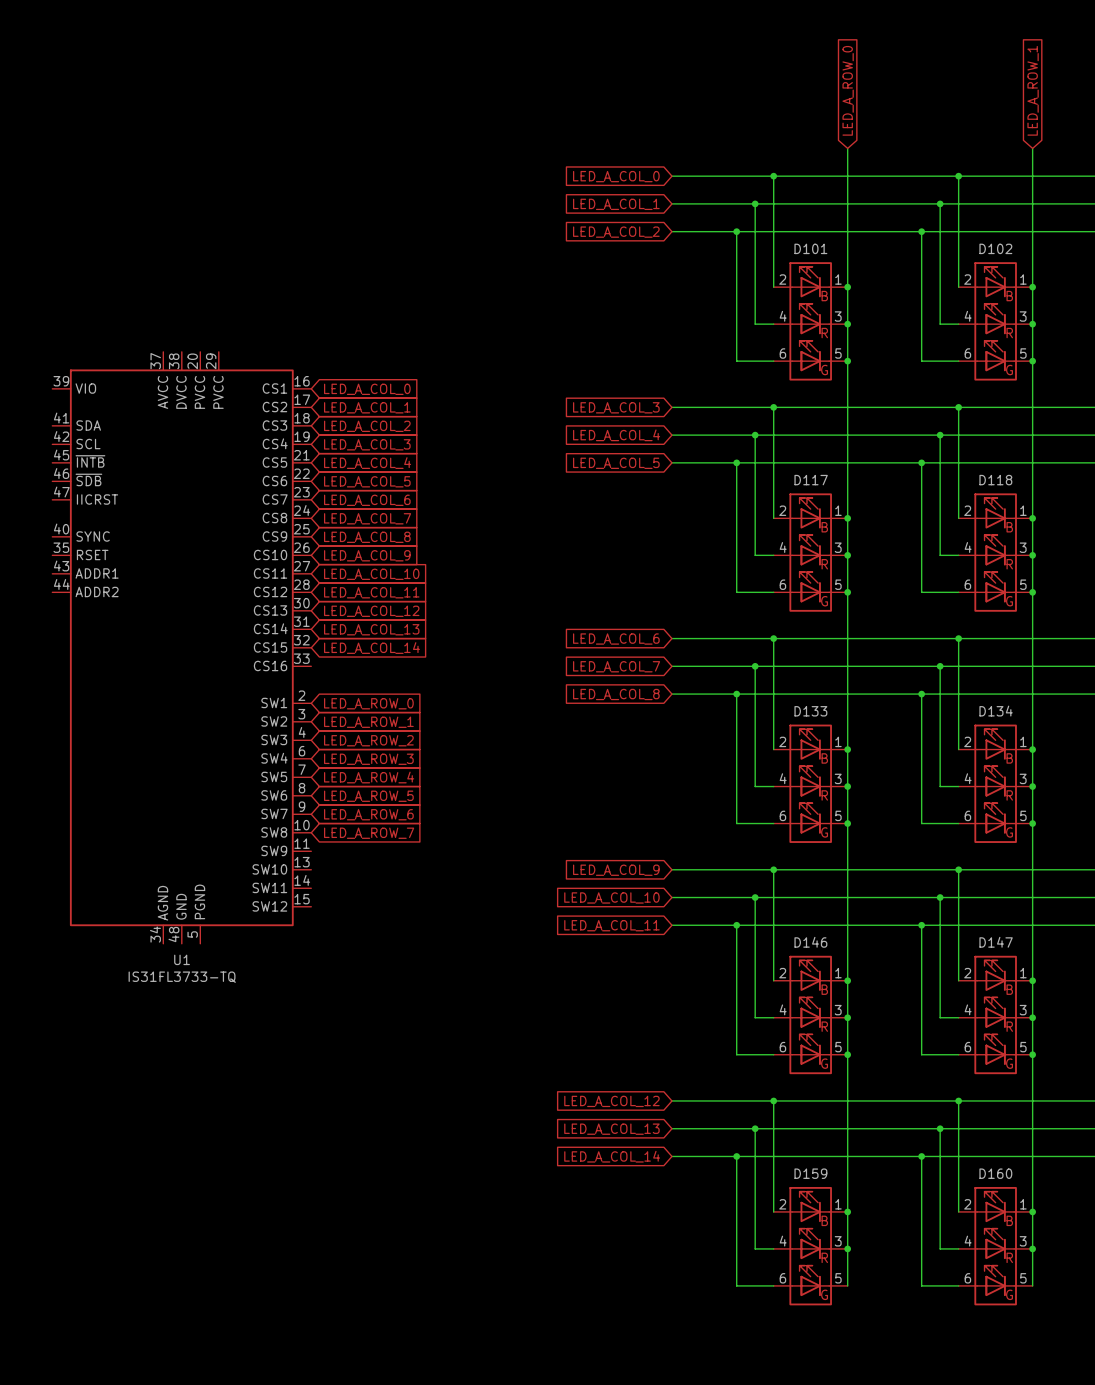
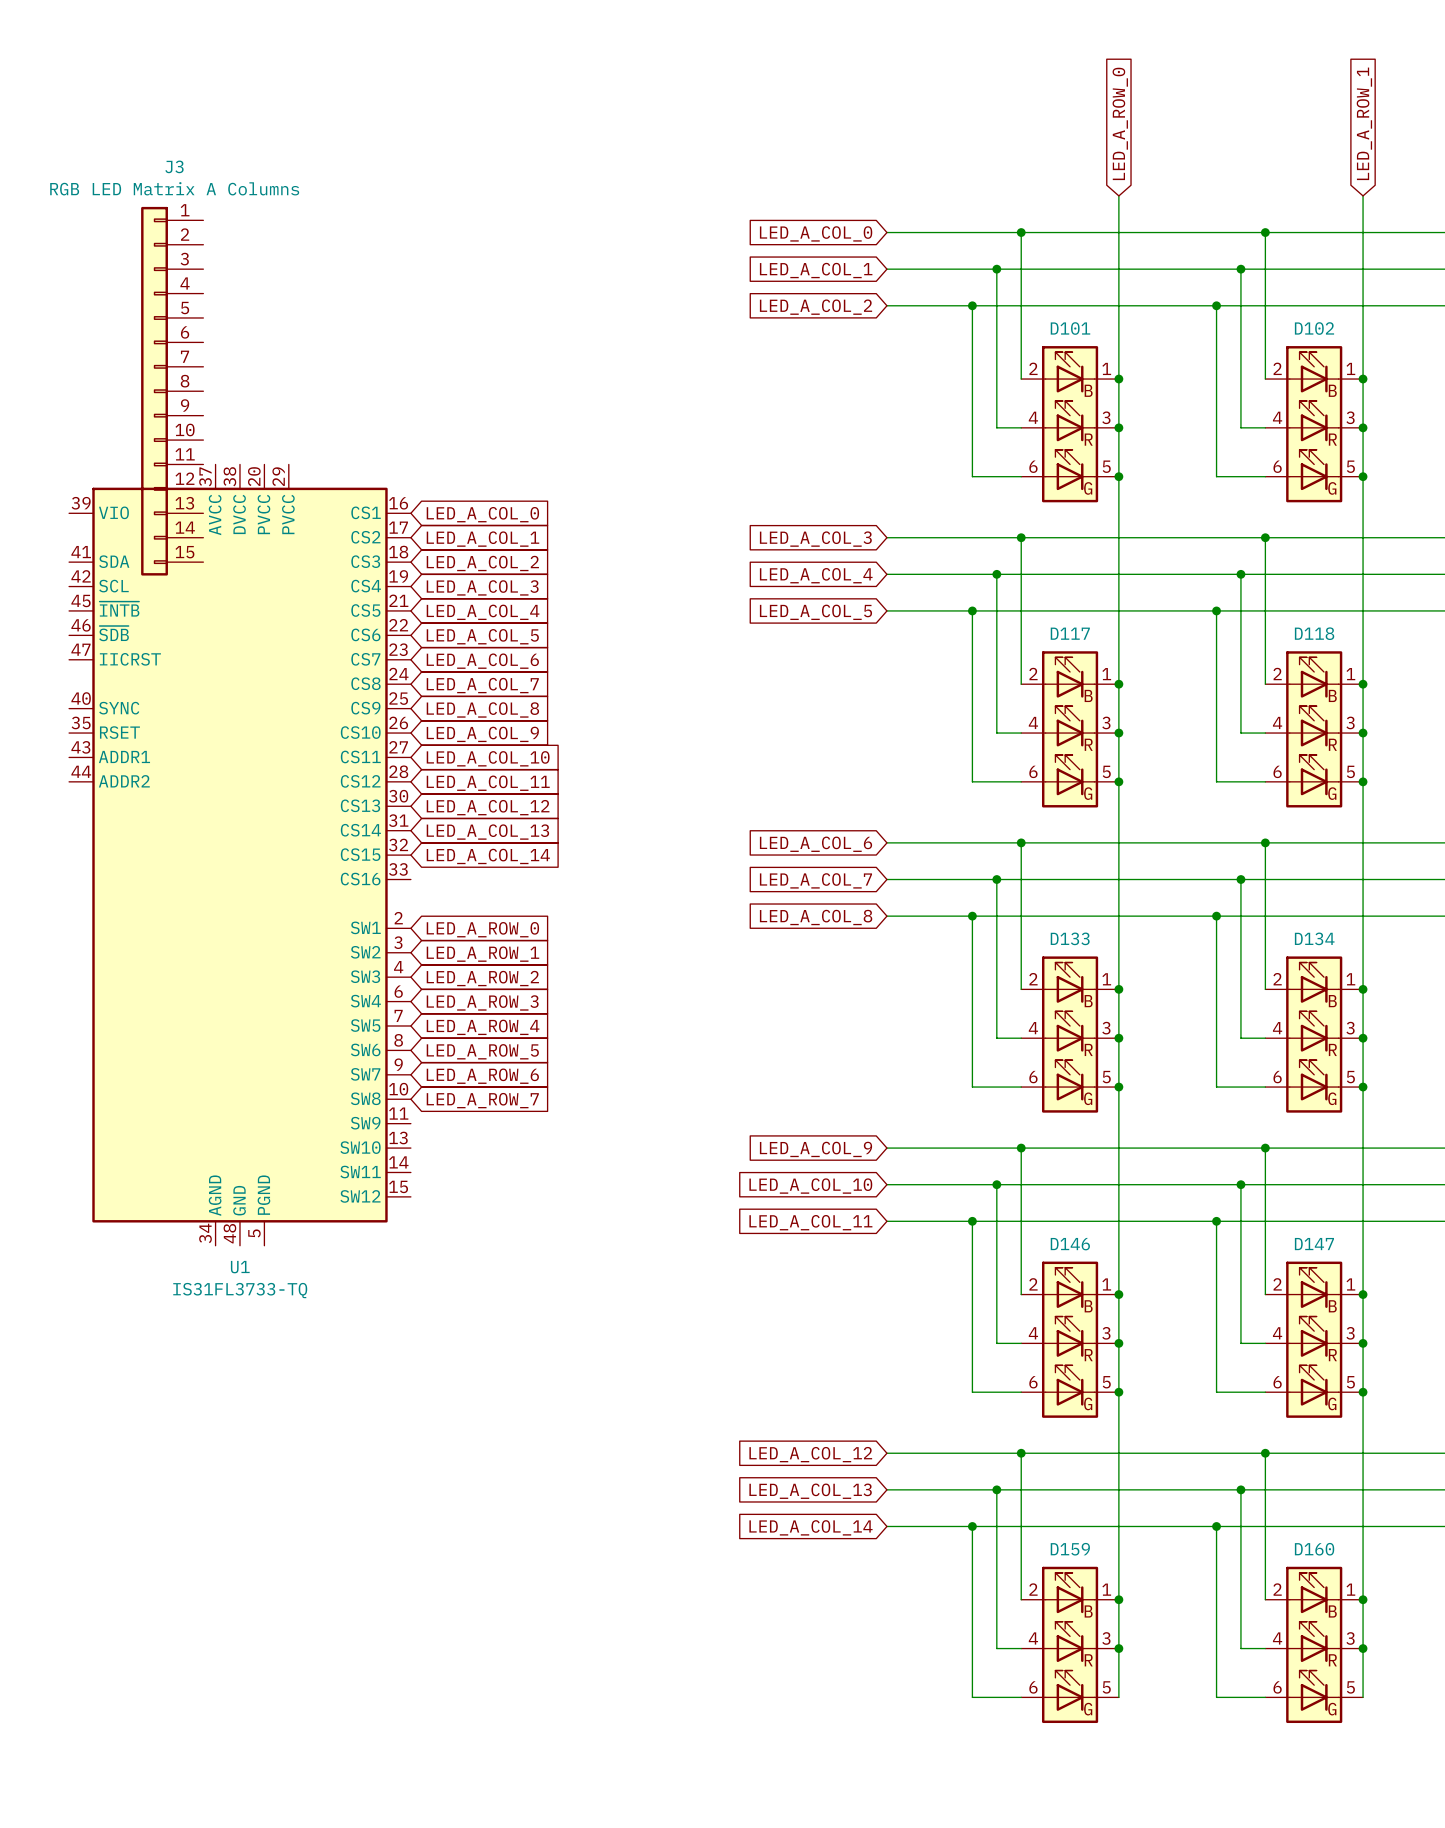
J3: none -> RGB LED Matrix A Columns (172, 391)

